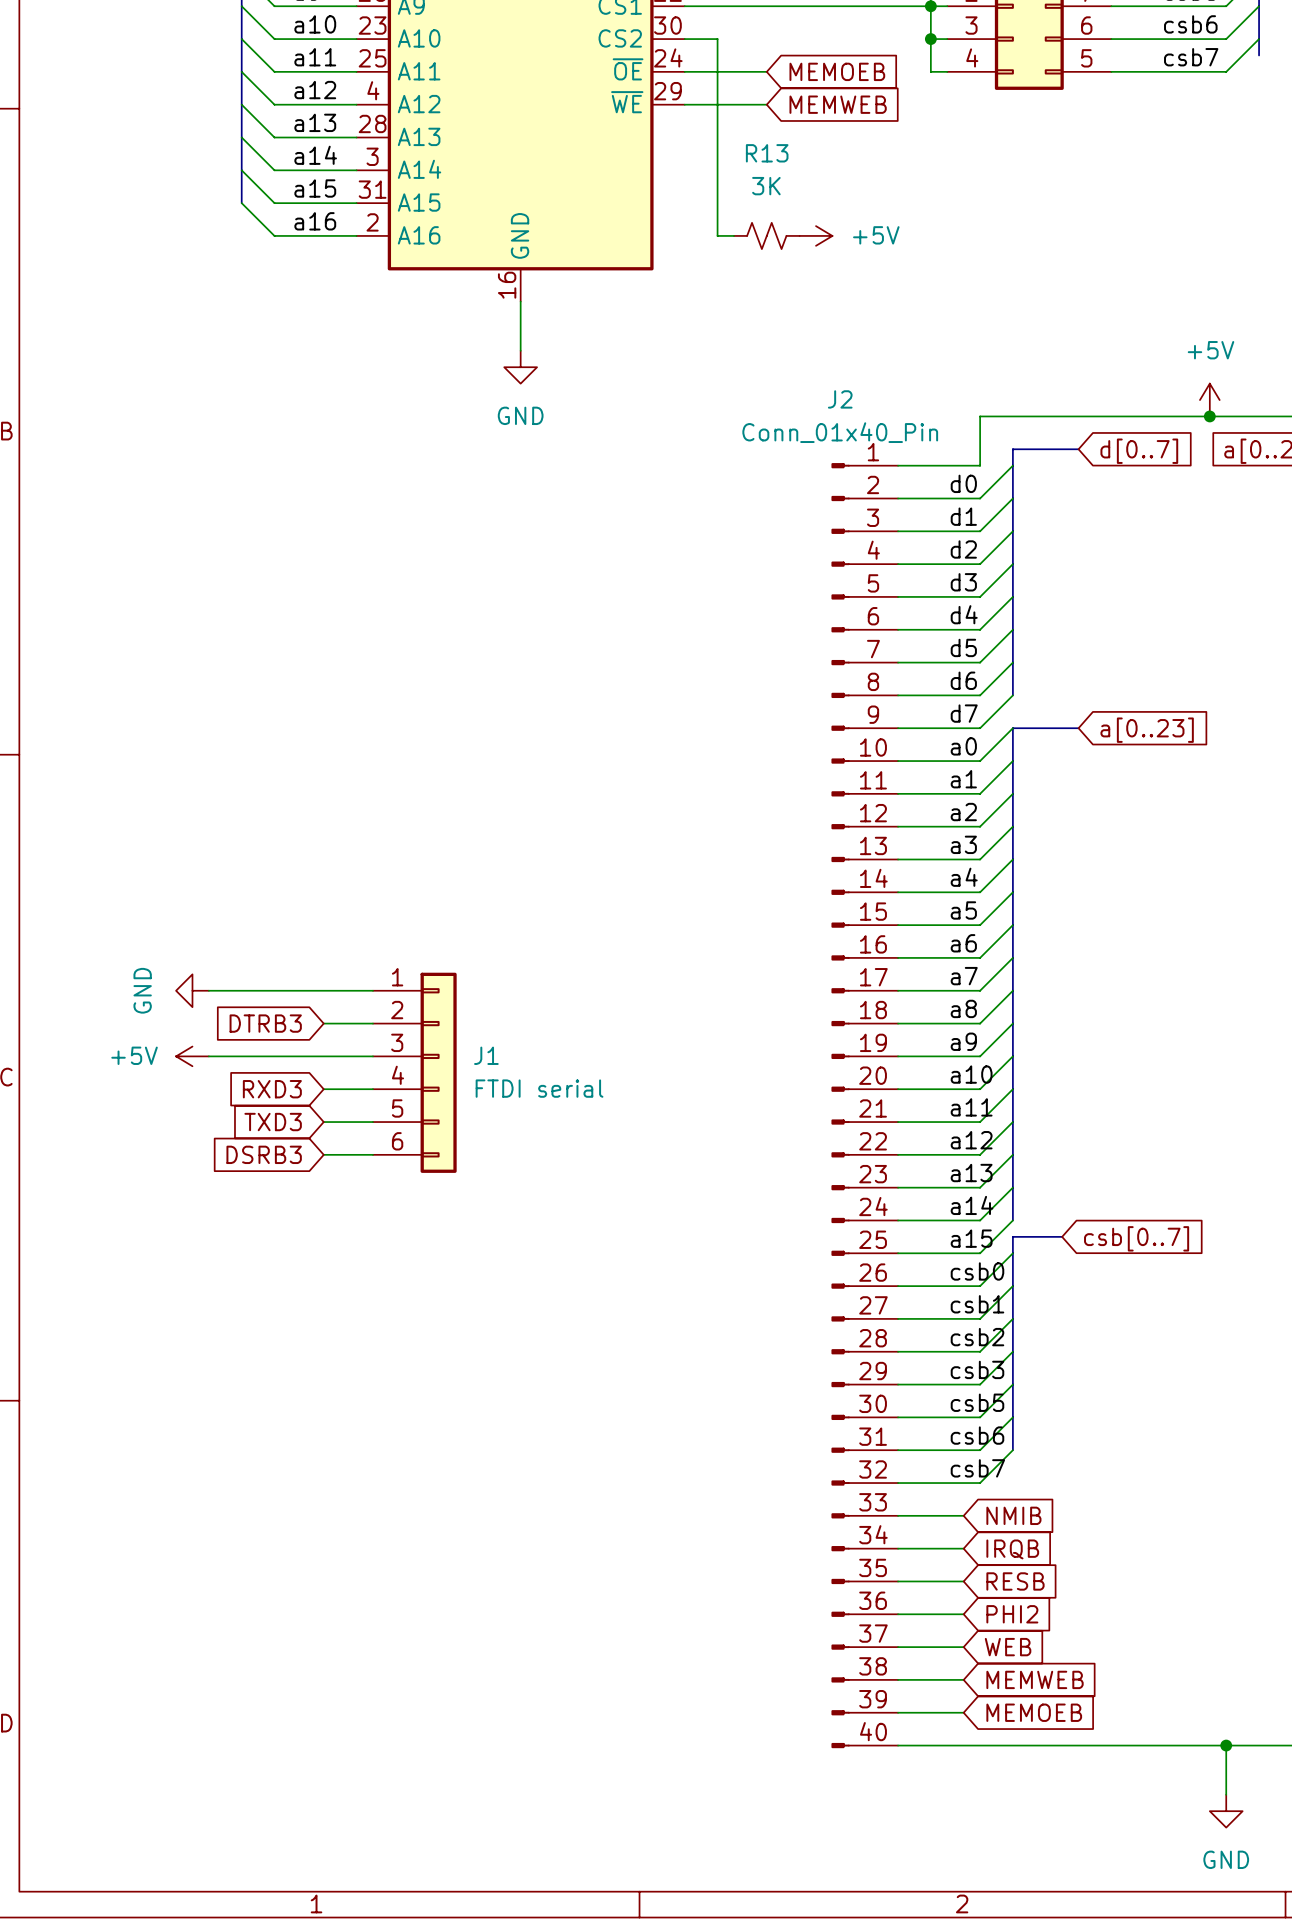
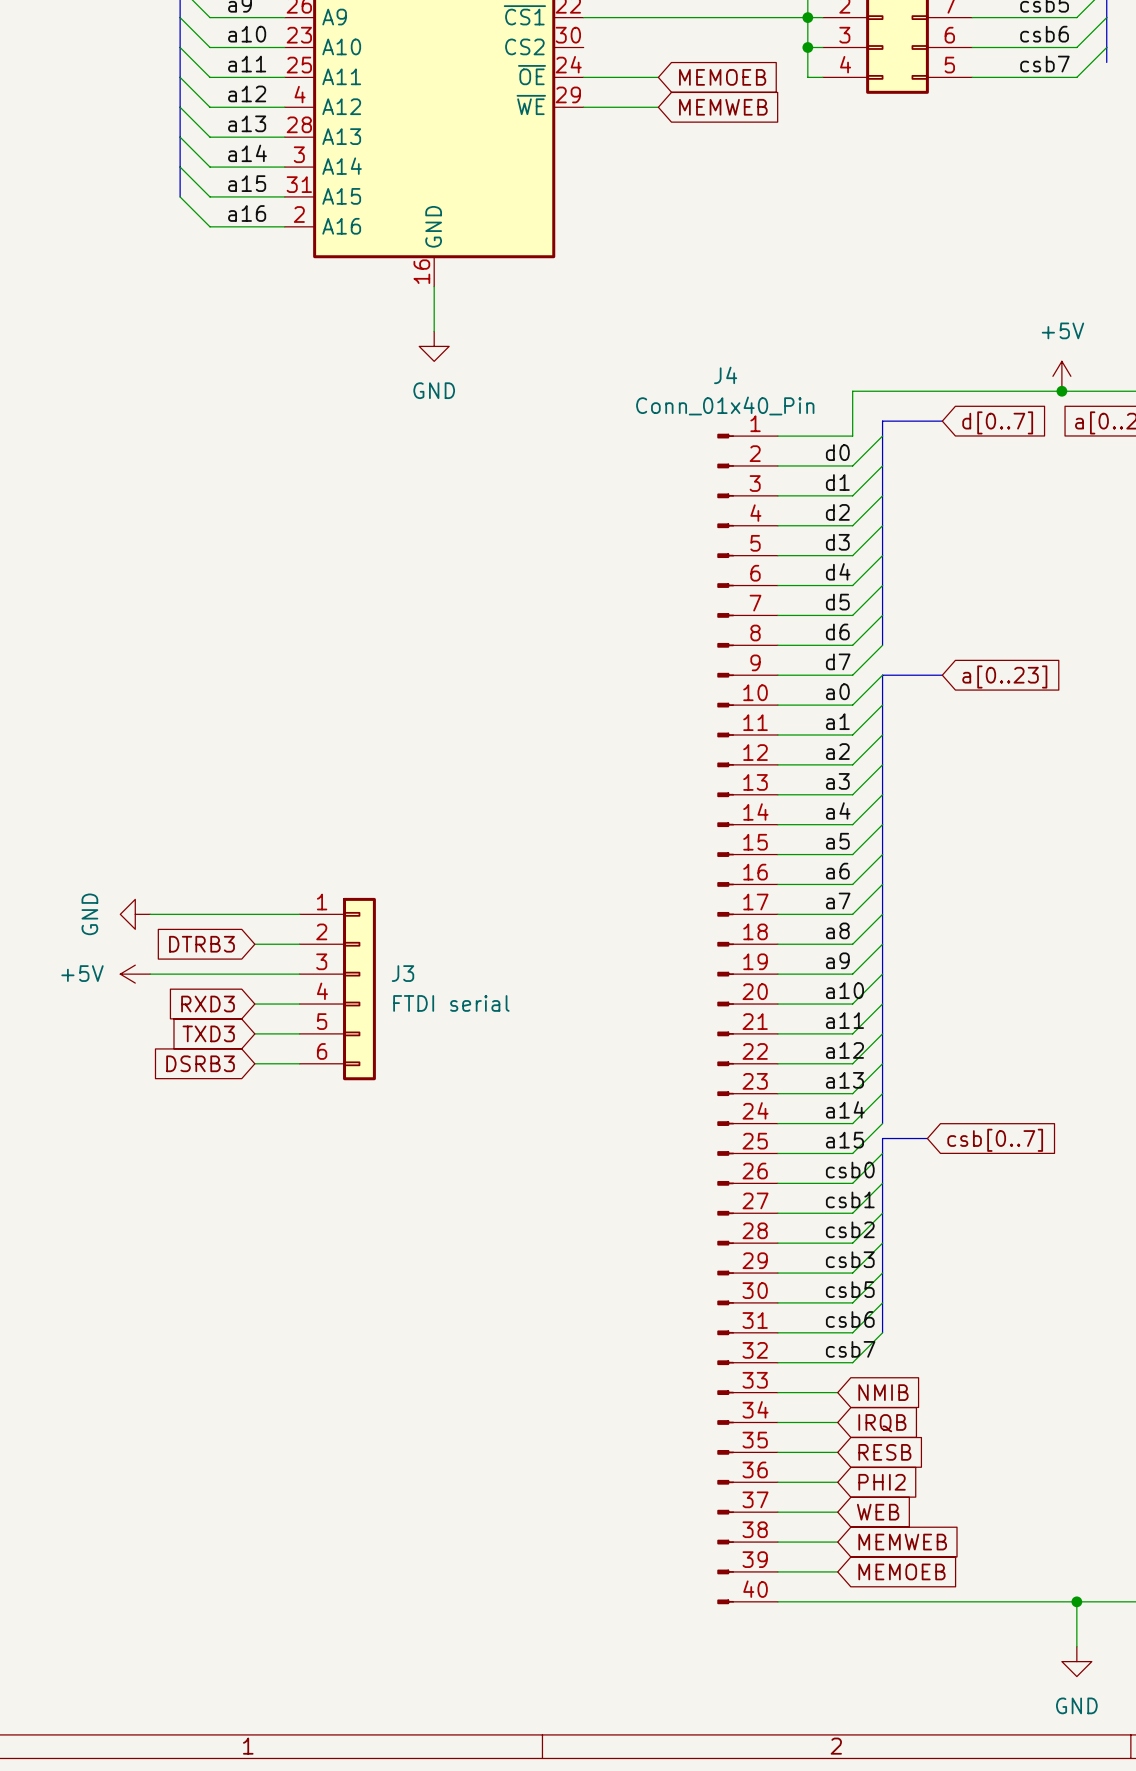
wire: (684, 39) (717, 39) (717, 235) (733, 235) -> none
R13: 3K (766, 235) -> none
power symbol: +5V (816, 235) -> none
J2 name: J2 (840, 399) -> J4 (725, 375)
J1 name: J1 (486, 1055) -> J3 (402, 973)

